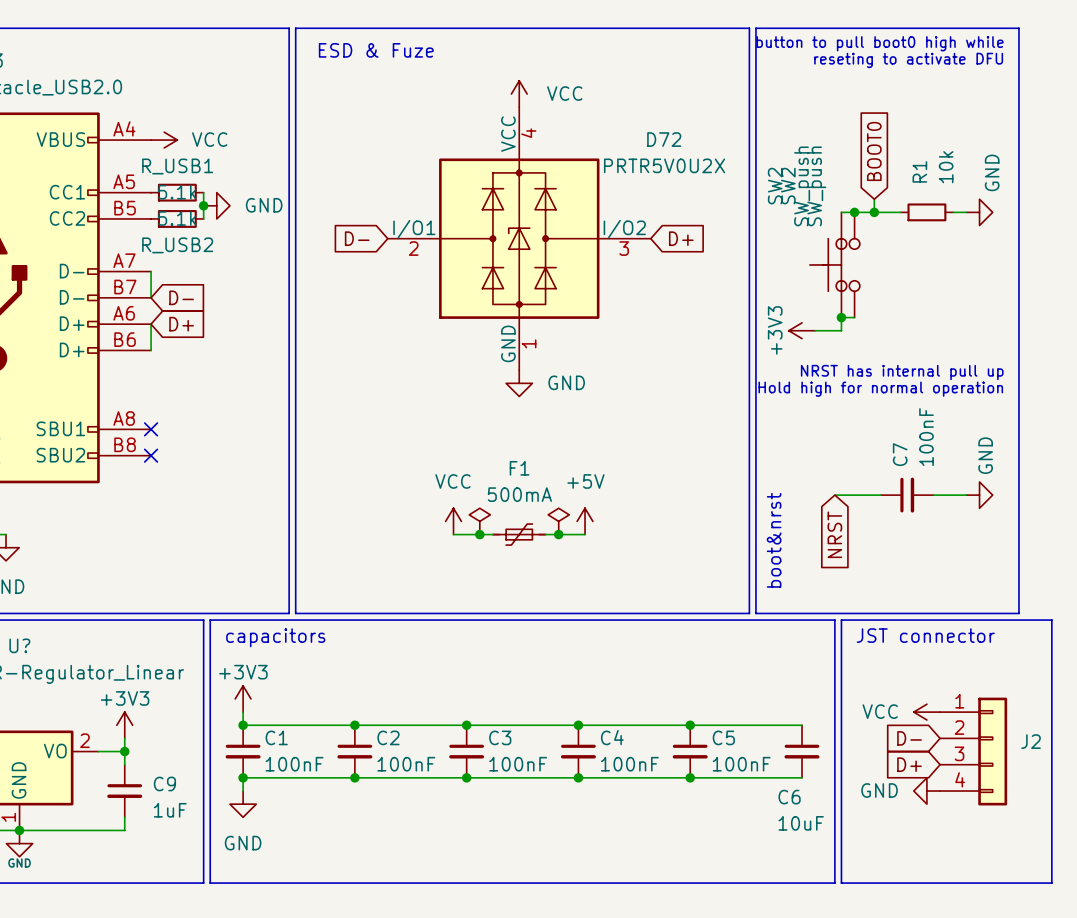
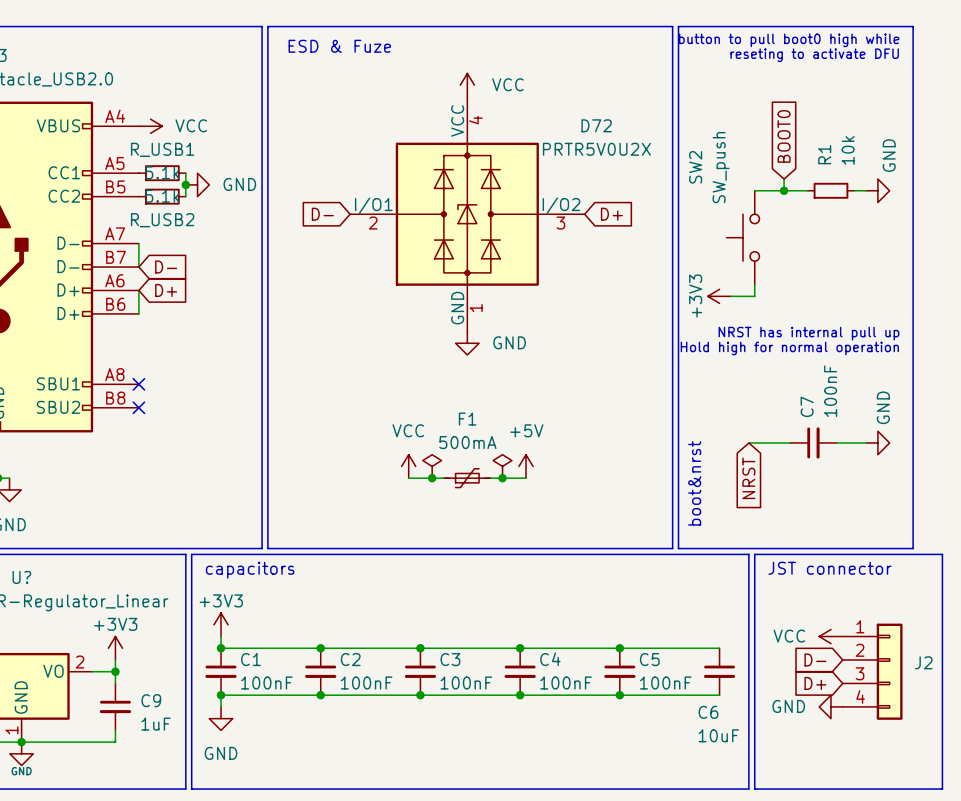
junction: (854, 212) -> none
SW2: SW_push (841, 264) -> none
wire: (841, 317) (854, 317) -> none
junction: (841, 317) -> none

